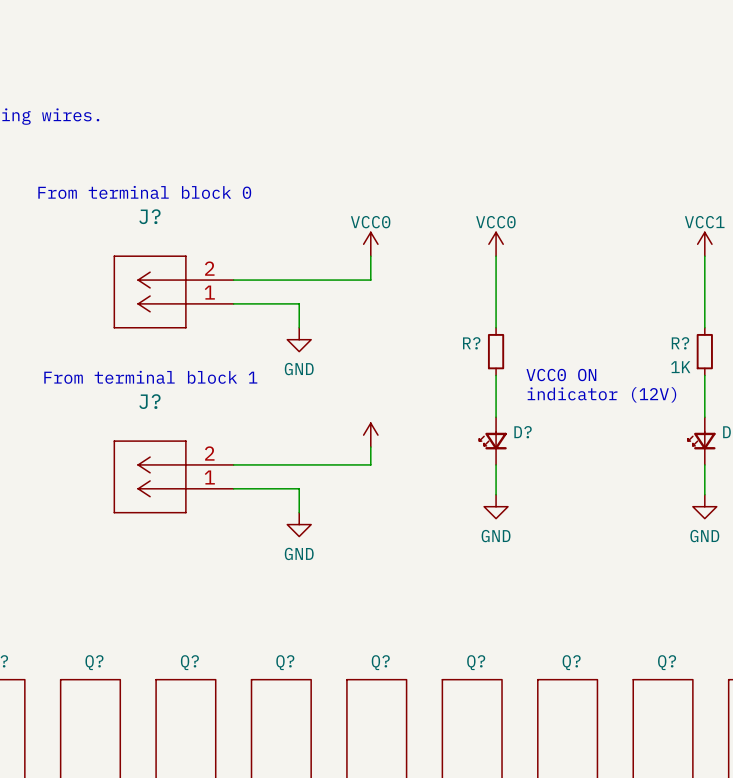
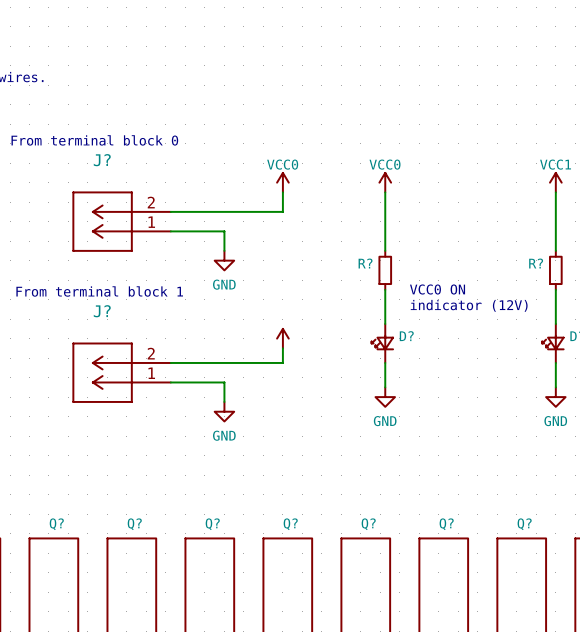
R? value: 1K (680, 367) -> none

